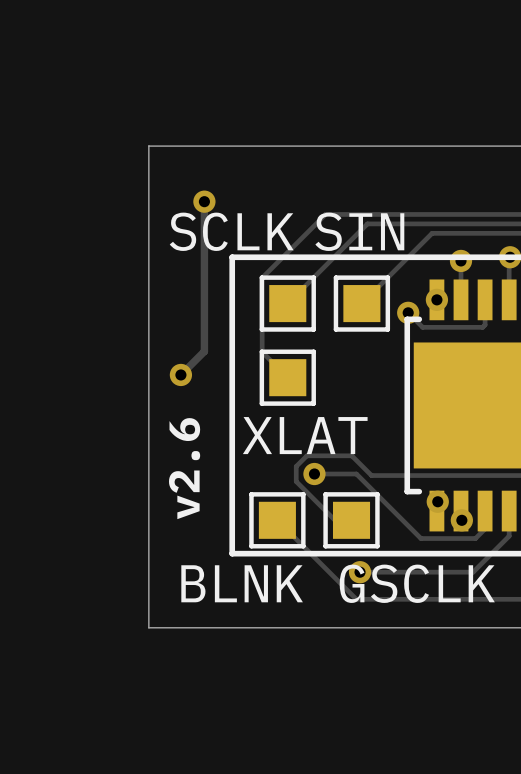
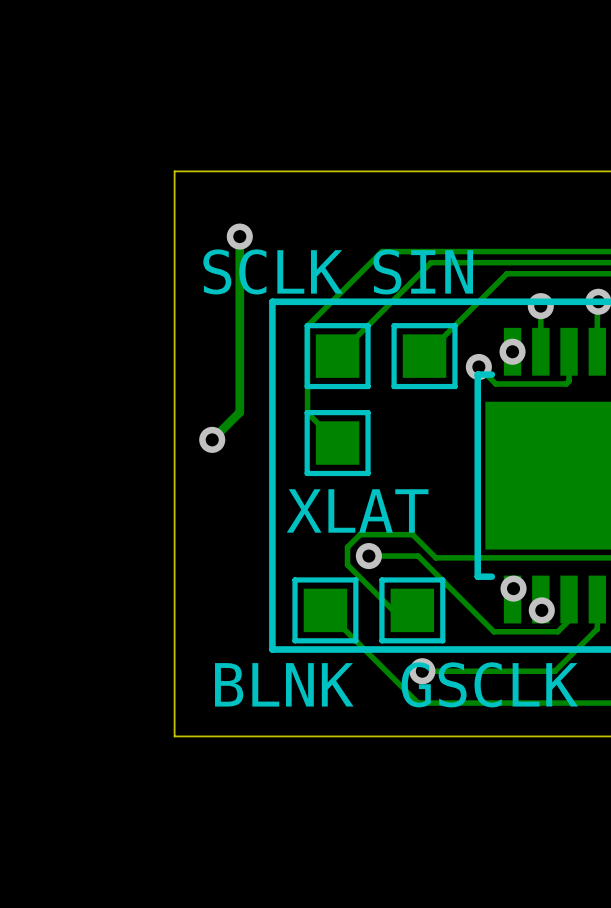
text: v2.6 (184, 468) -> none

